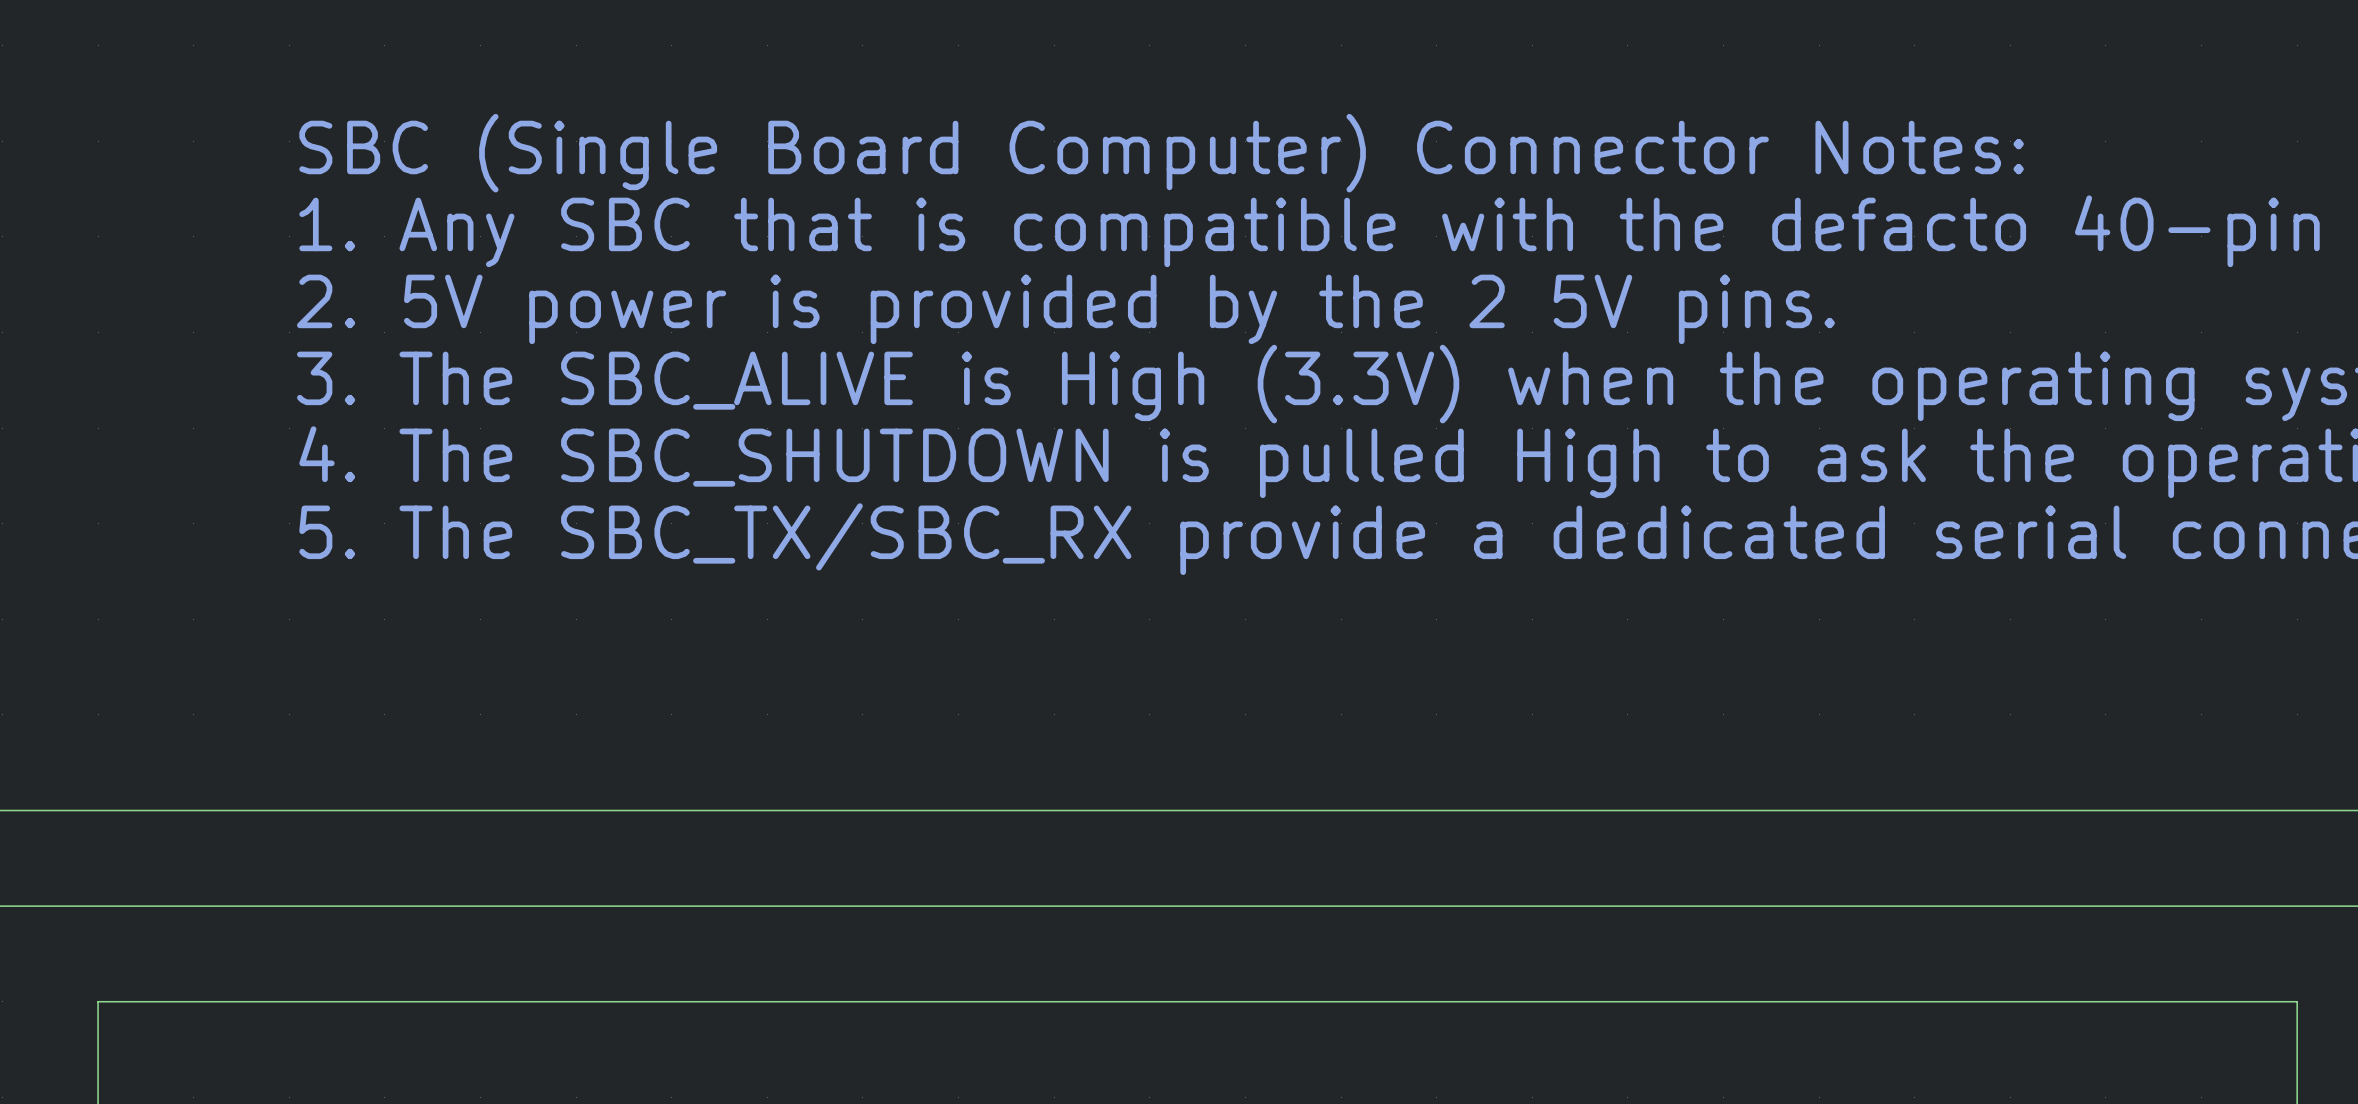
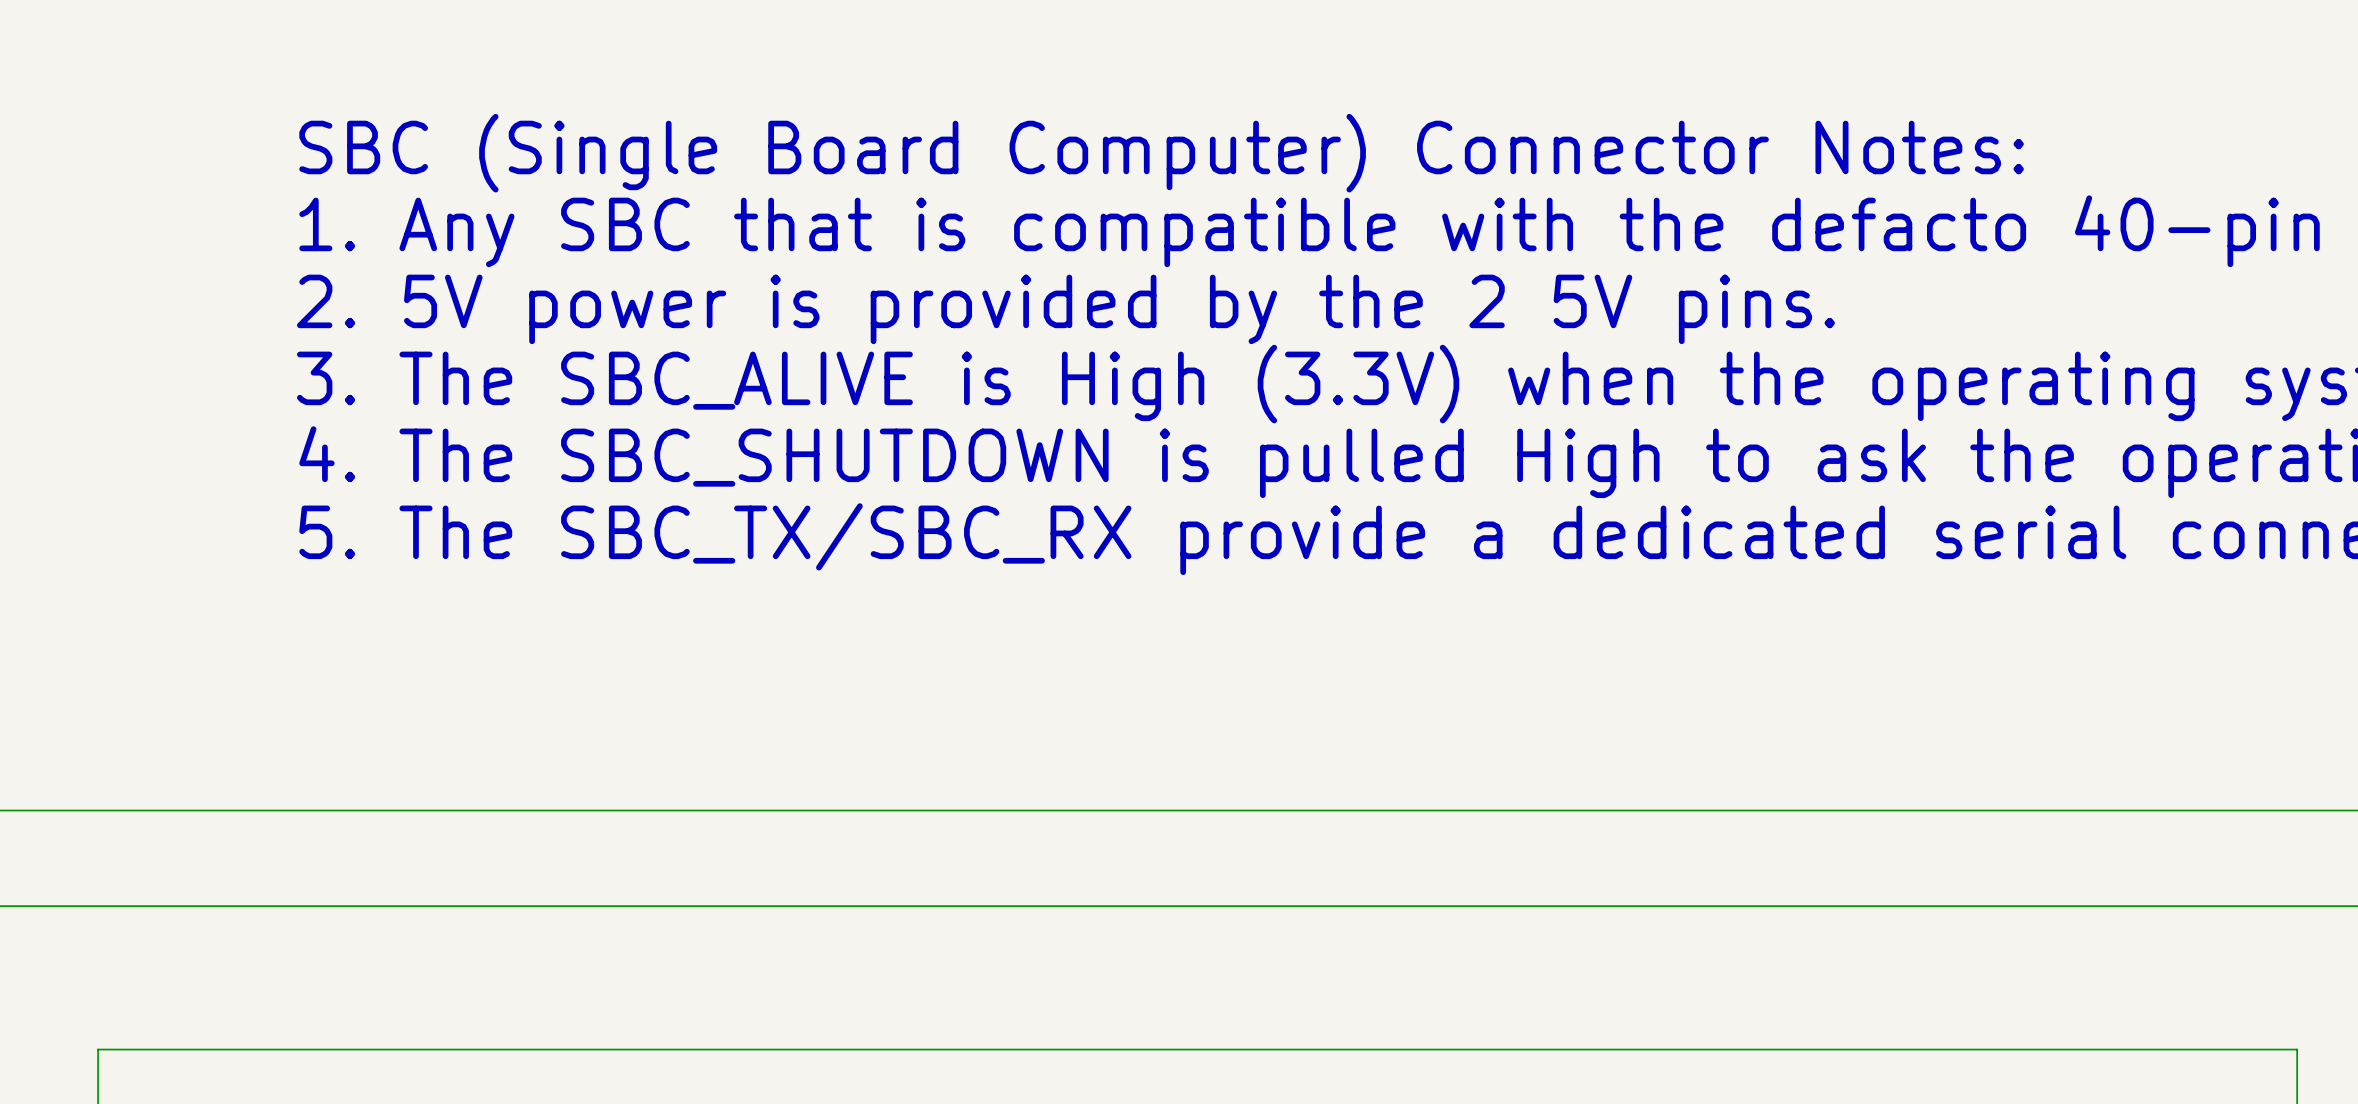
wire: (98, 1049) (98, 1001) (2297, 1001) (2297, 1049) -> (98, 1049) (2297, 1049)

